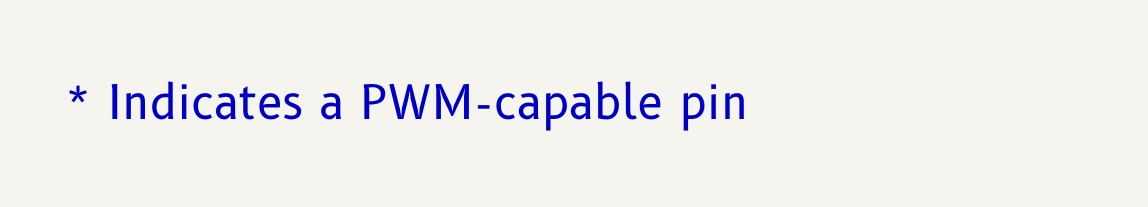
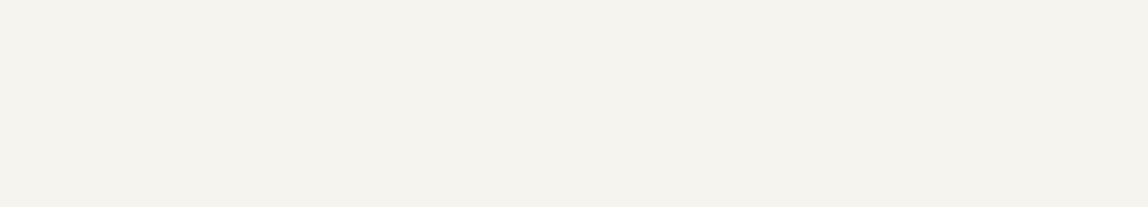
text: * Indicates a PWM-capable pin (406, 106) -> none

